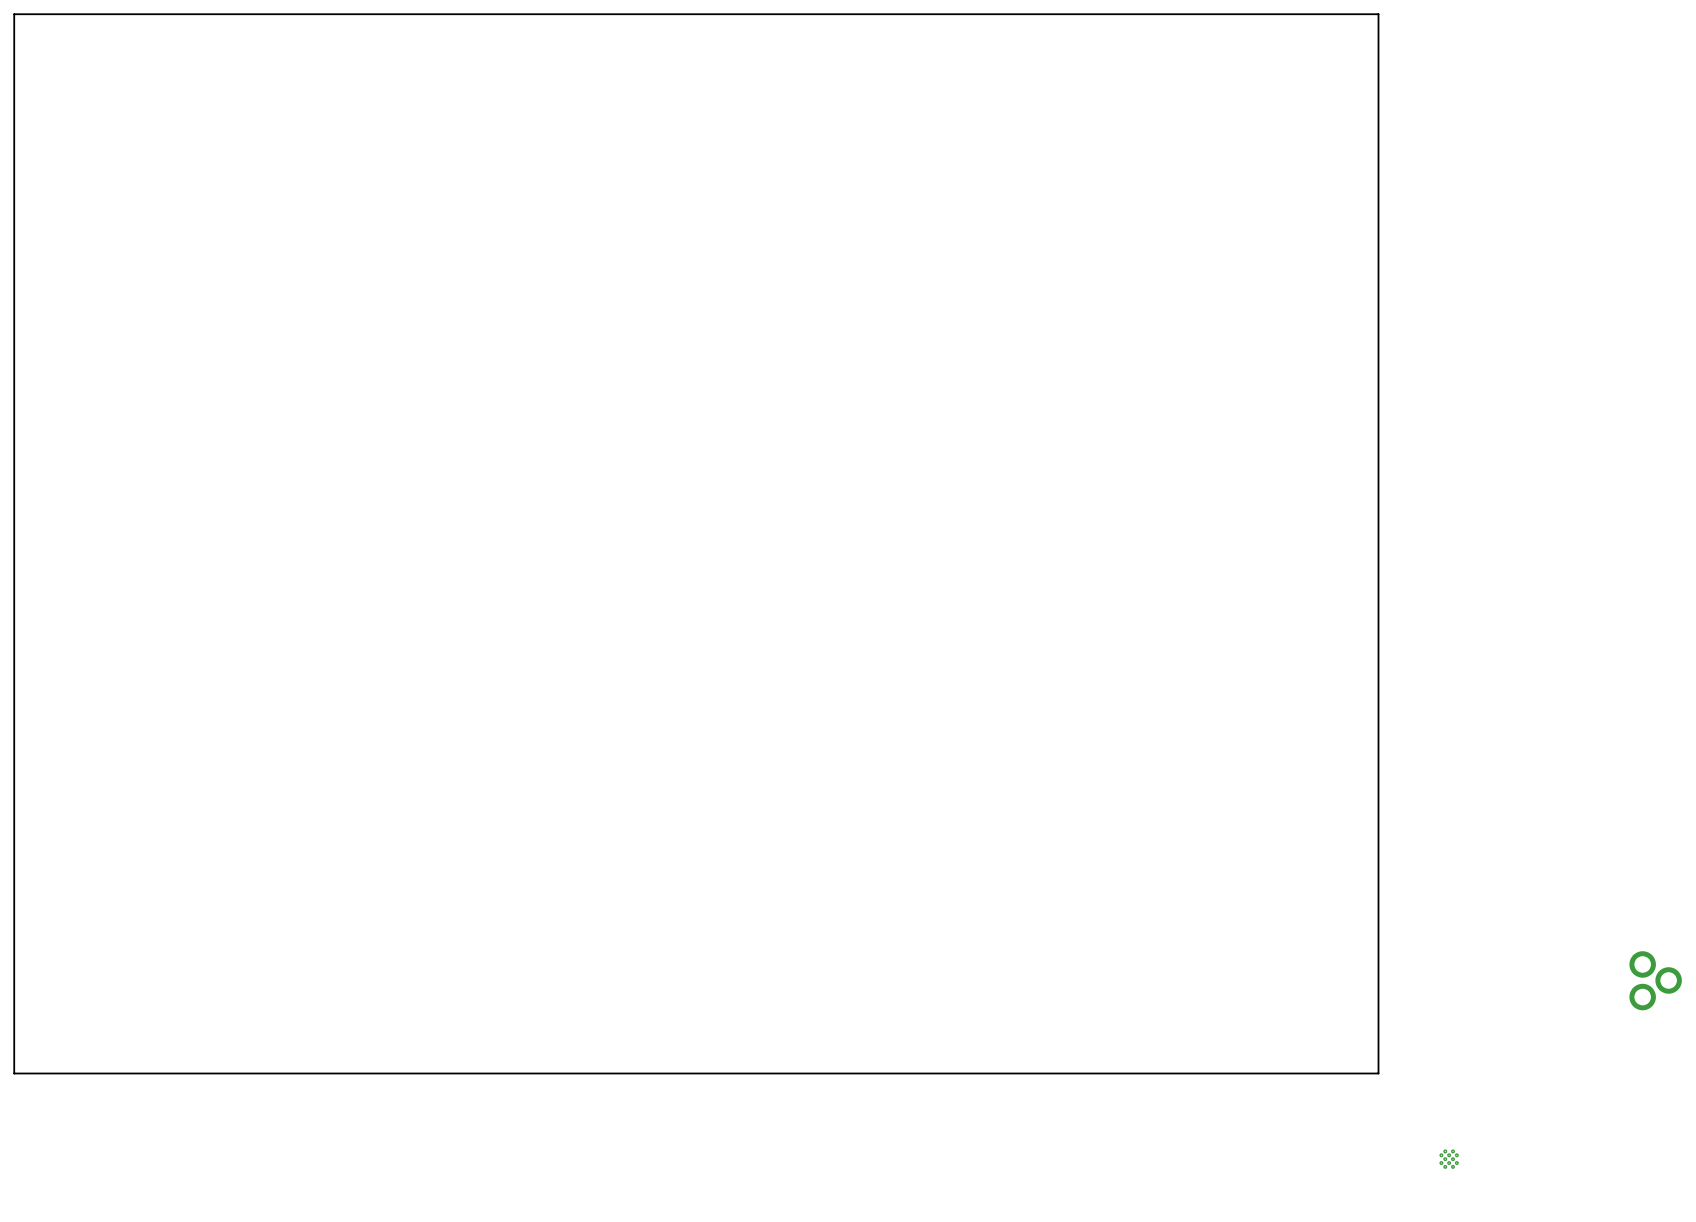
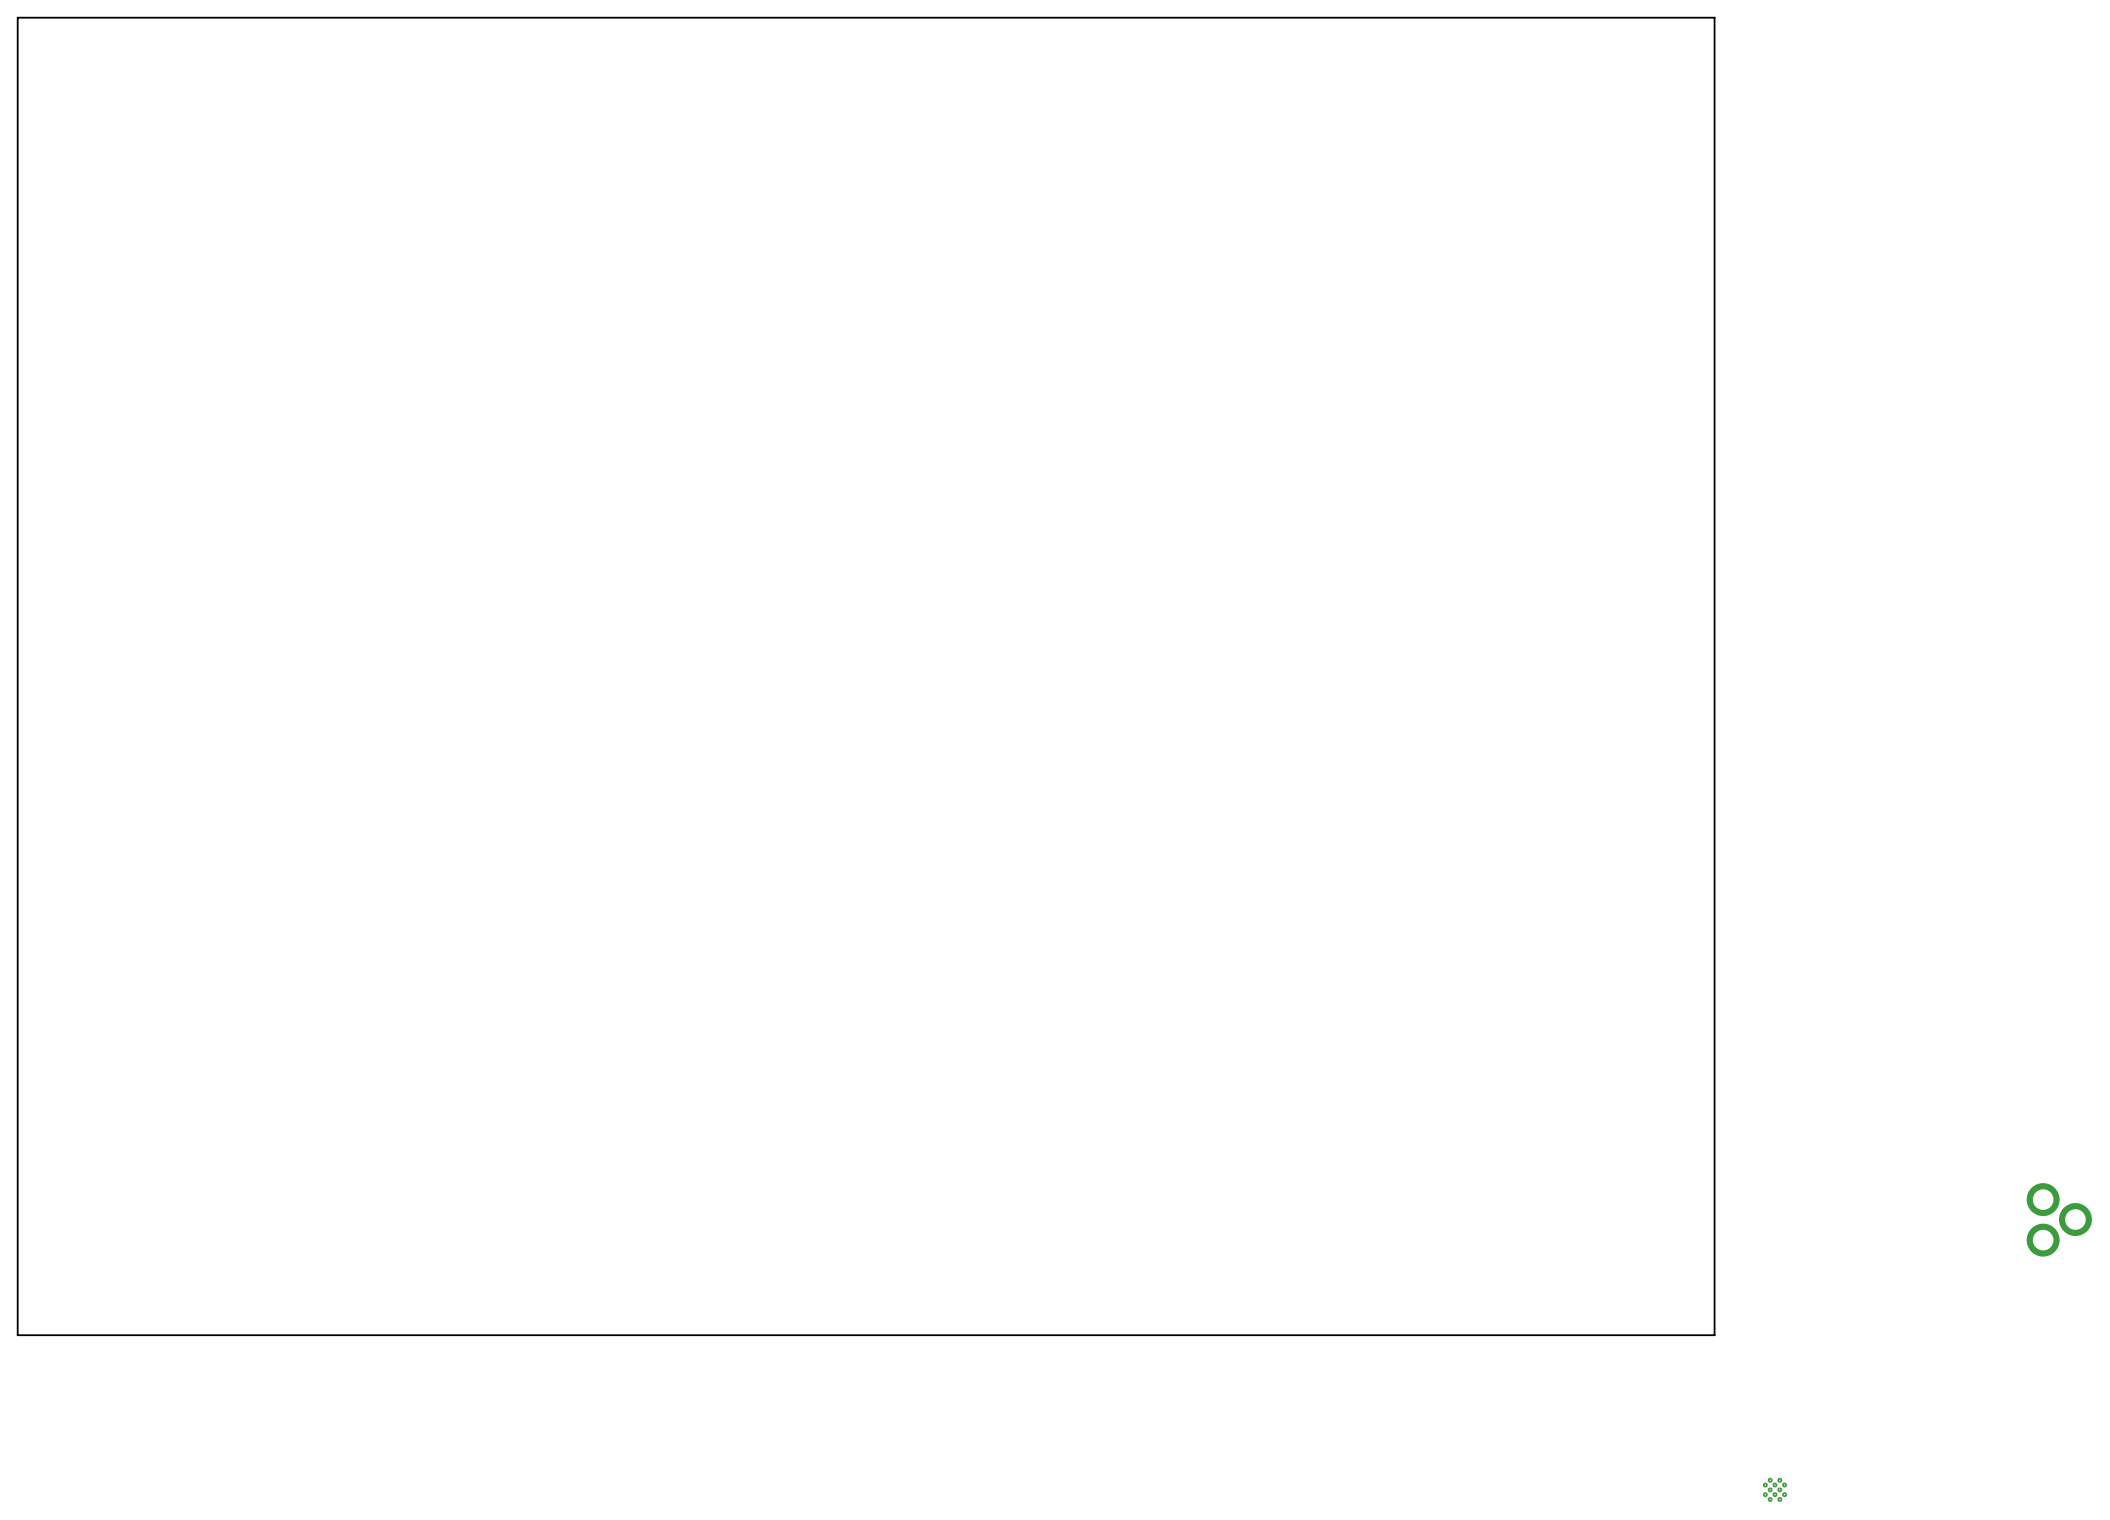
part position: (1449, 1159) -> (1774, 1489)

